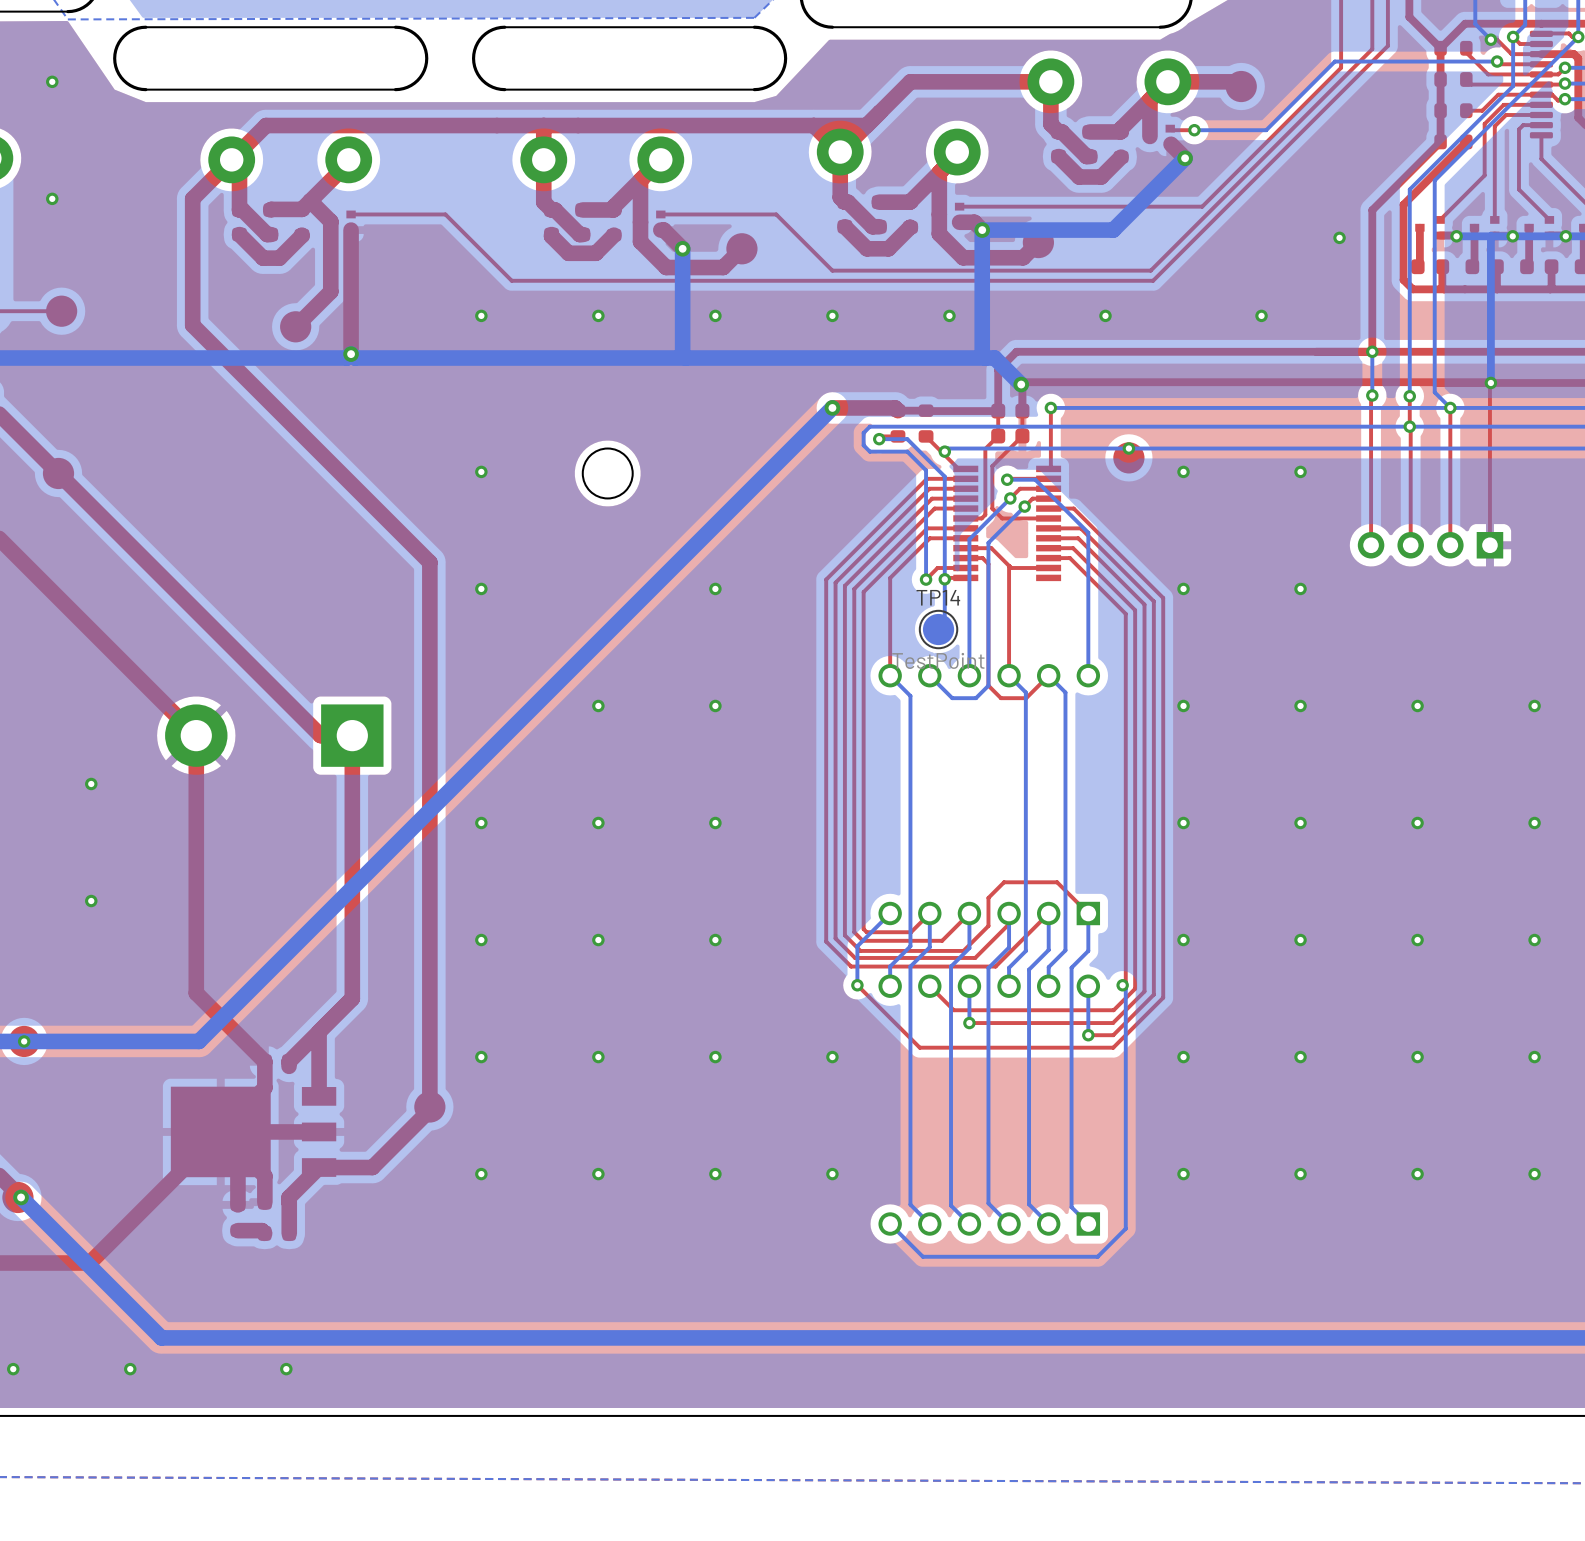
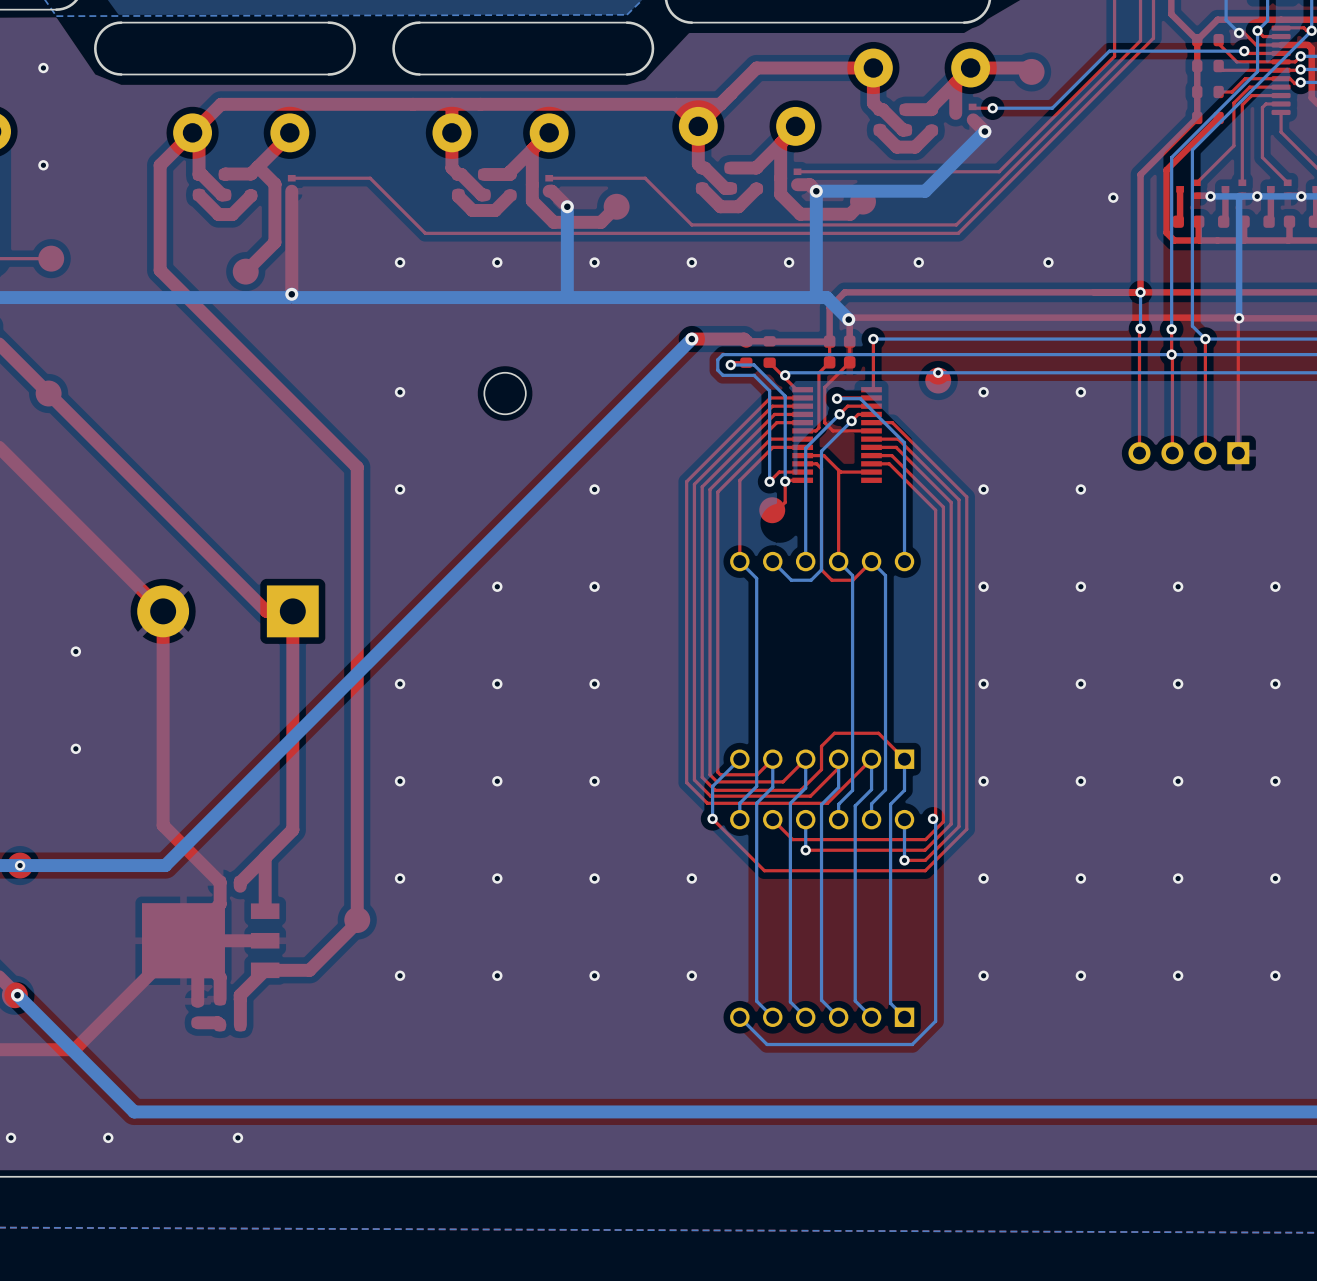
top track: none -> (785, 481) (785, 502) (772, 515)
bottom track: (944, 579) (944, 620) (938, 626) (938, 629) -> none
TP14 side: bottom (938, 629) -> top (772, 510)

